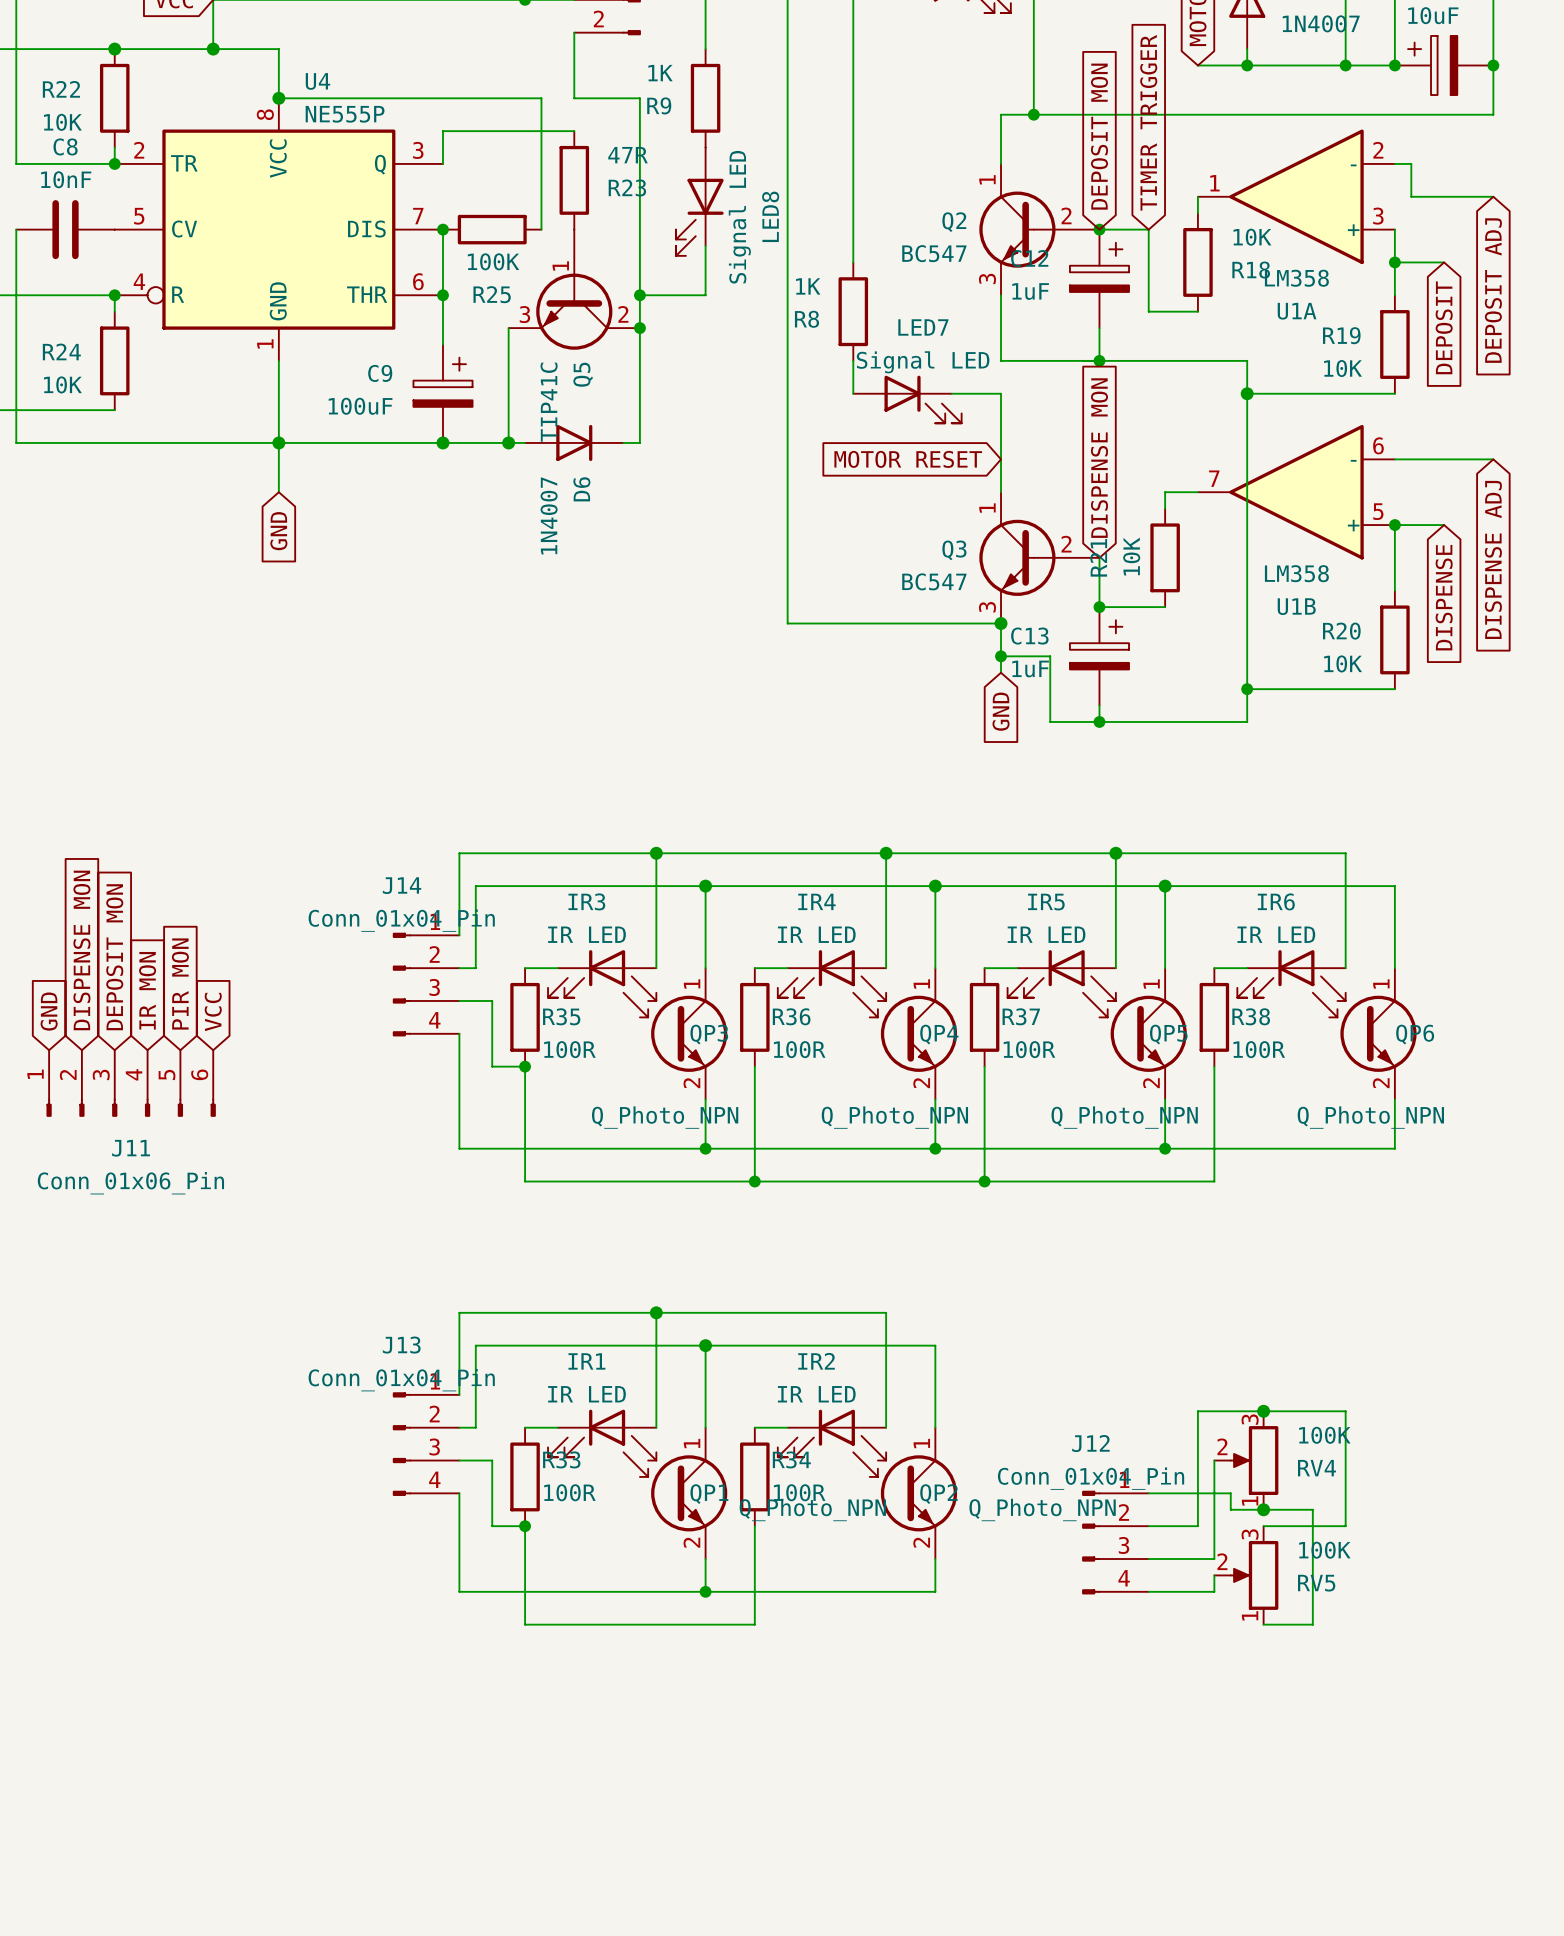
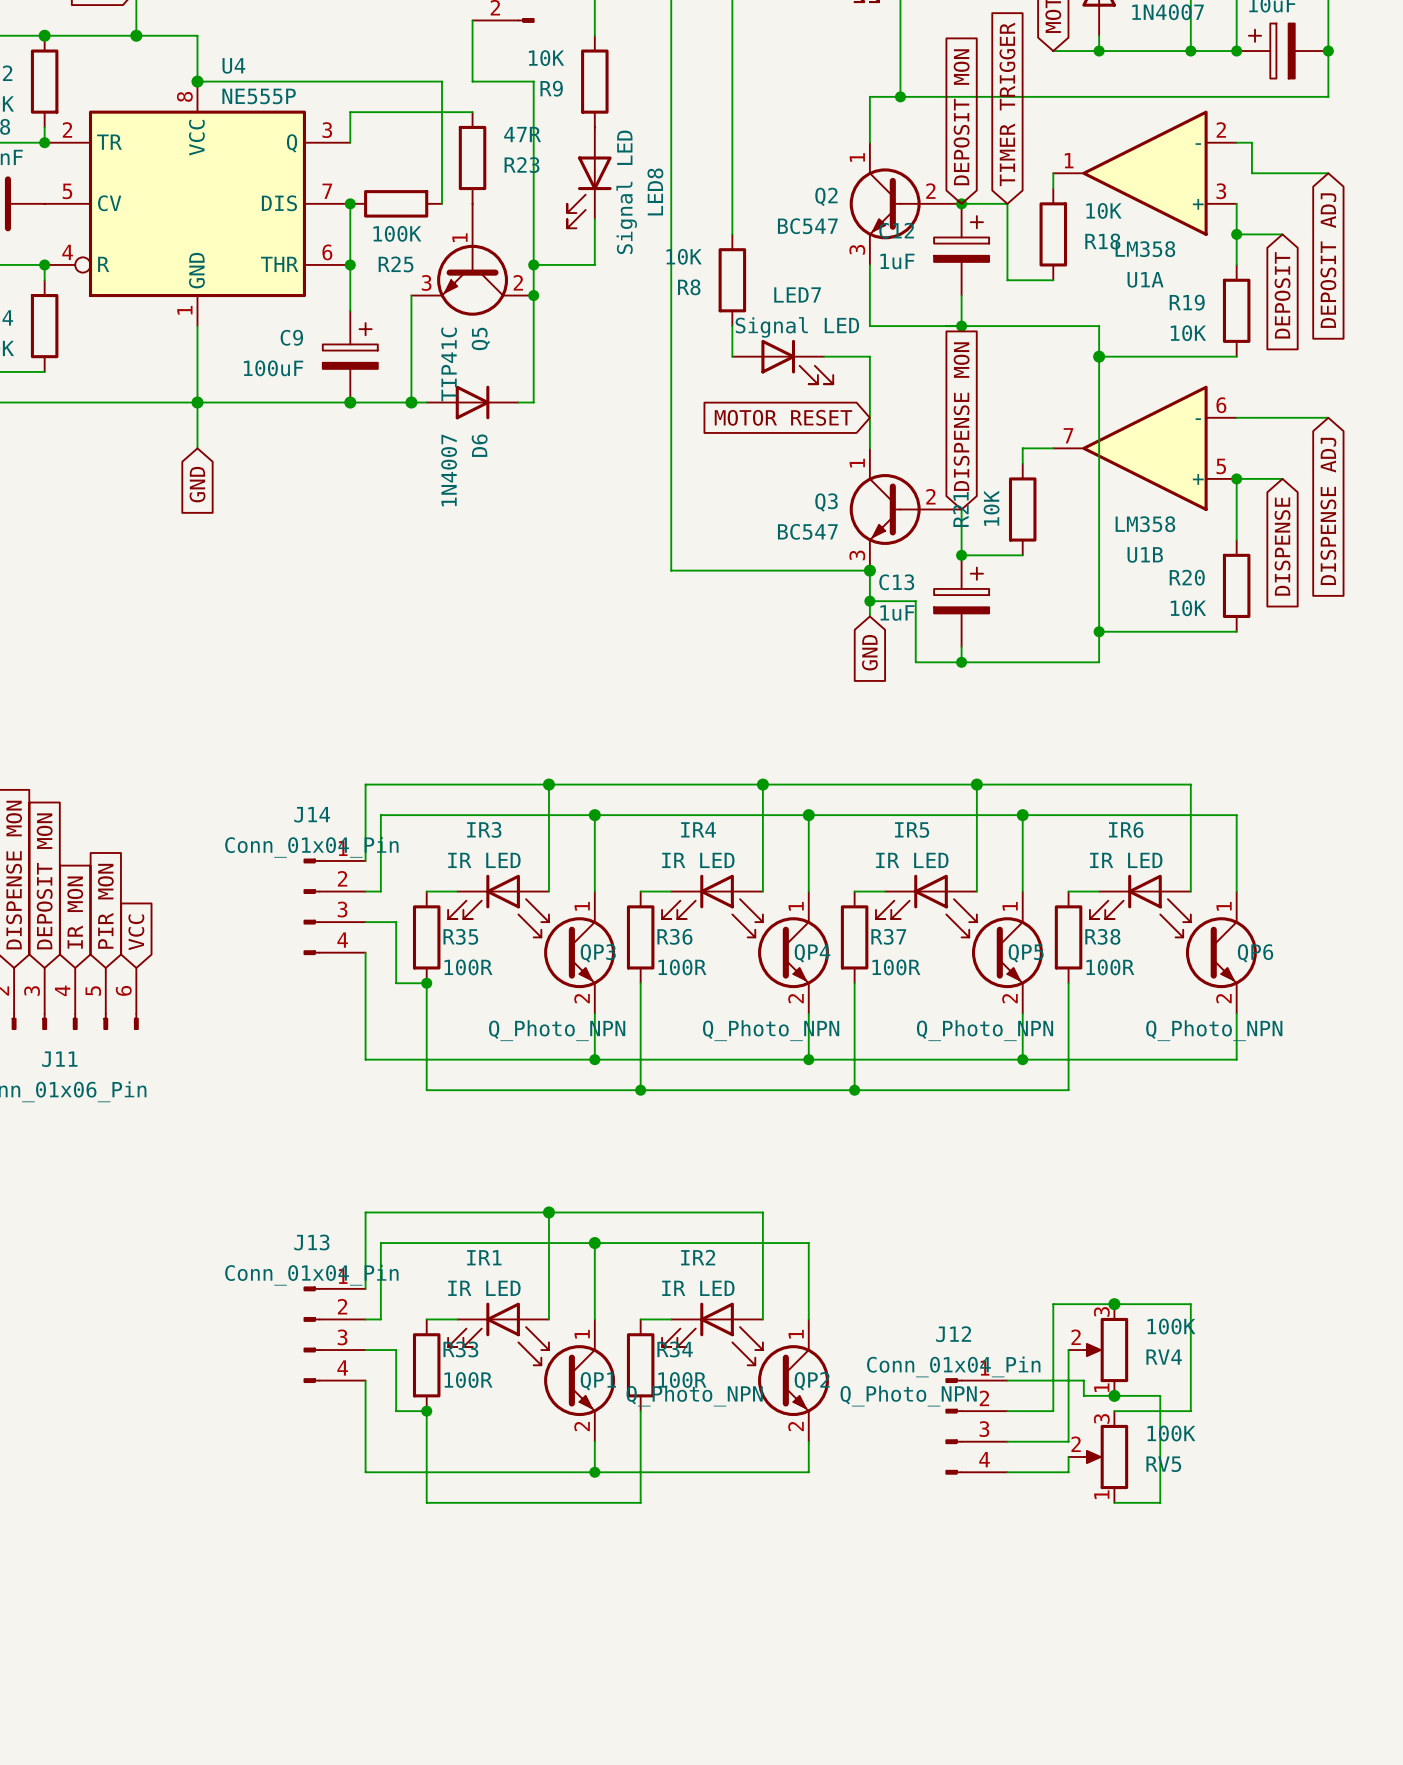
R9 value: 1K (660, 73) -> 10K (546, 58)
R8 value: 1K (808, 286) -> 10K (684, 256)

